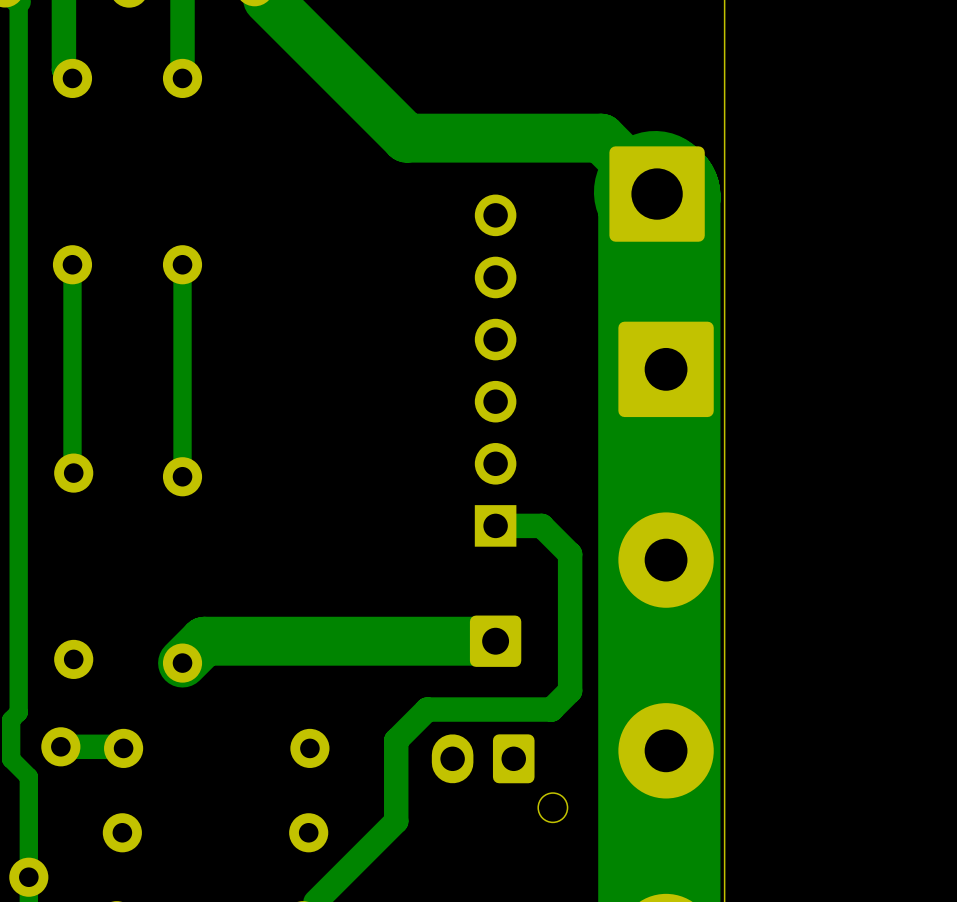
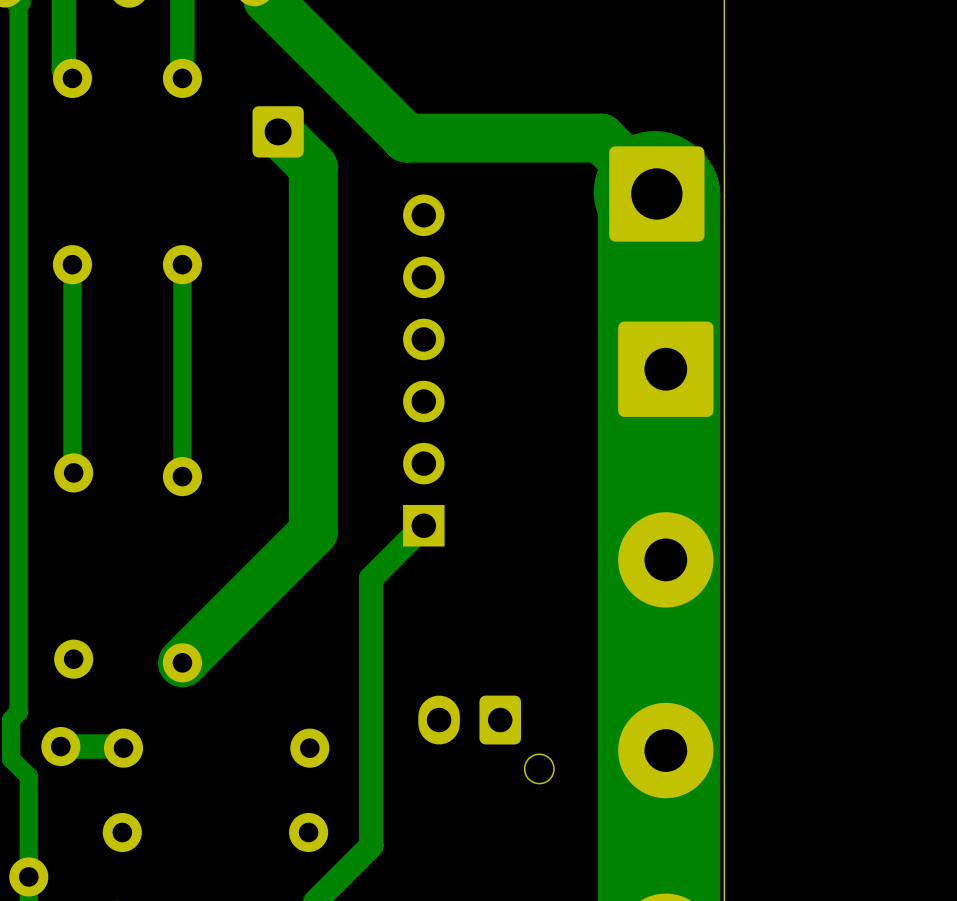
part position: (495, 370) -> (423, 370)
track: (495, 525) (541, 525) (570, 554) (570, 690) (551, 709) (427, 709) (396, 740) (396, 821) (371, 846) -> (423, 525) (371, 578) (371, 845)
track: (495, 641) (204, 641) -> (278, 131) (313, 166) (313, 532) (204, 640)
part position: (495, 641) -> (278, 131)
part position: (499, 778) -> (486, 739)

